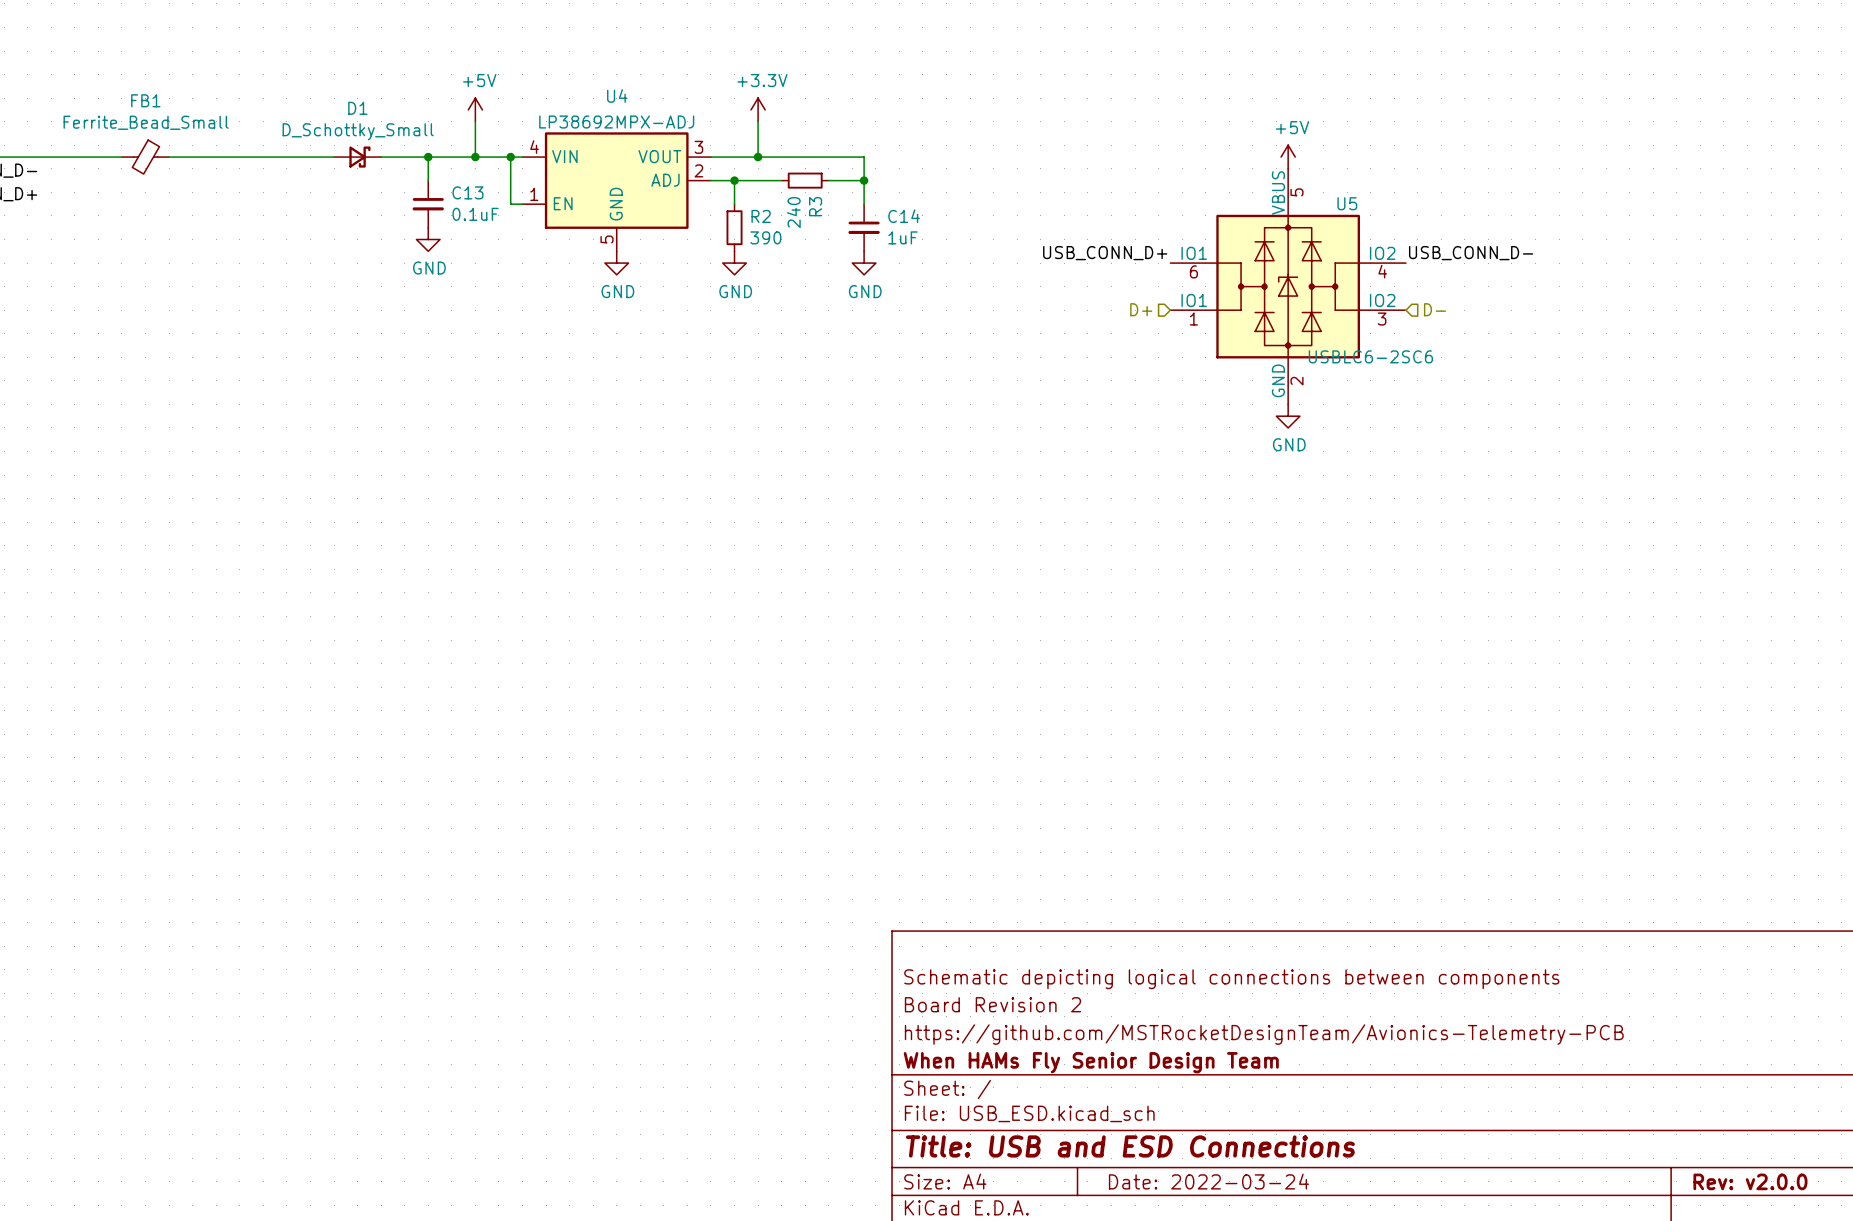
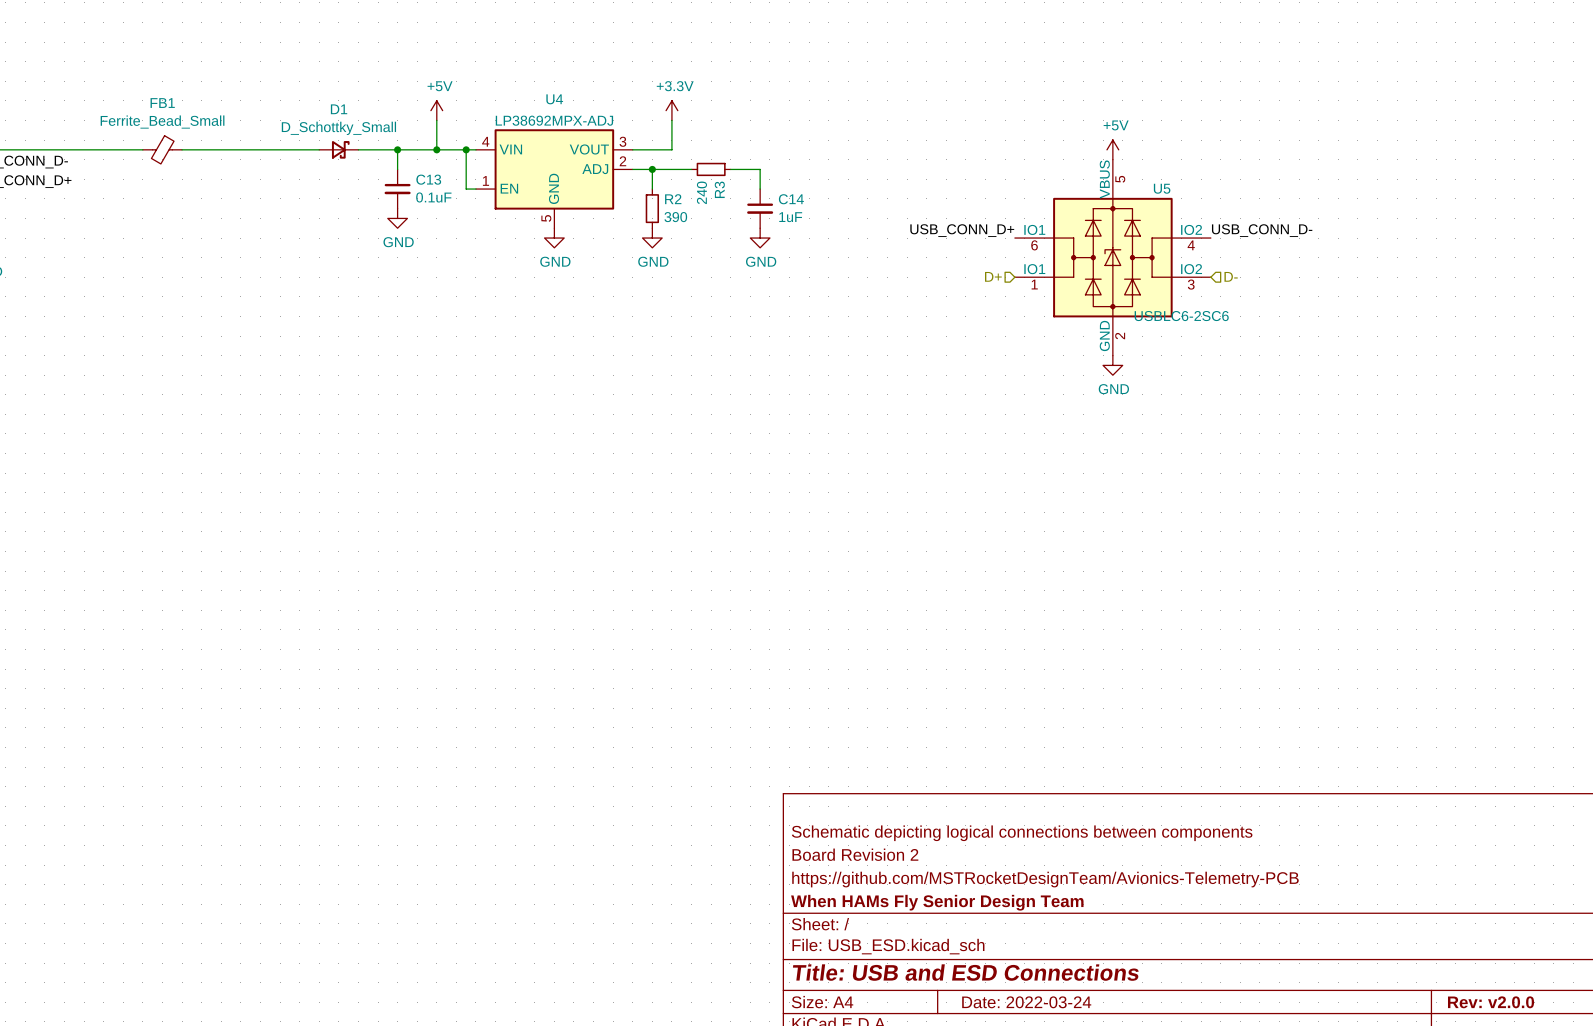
wire: (758, 157) (864, 157) (864, 180) -> none
junction: (758, 157) -> none
junction: (864, 180) -> none

